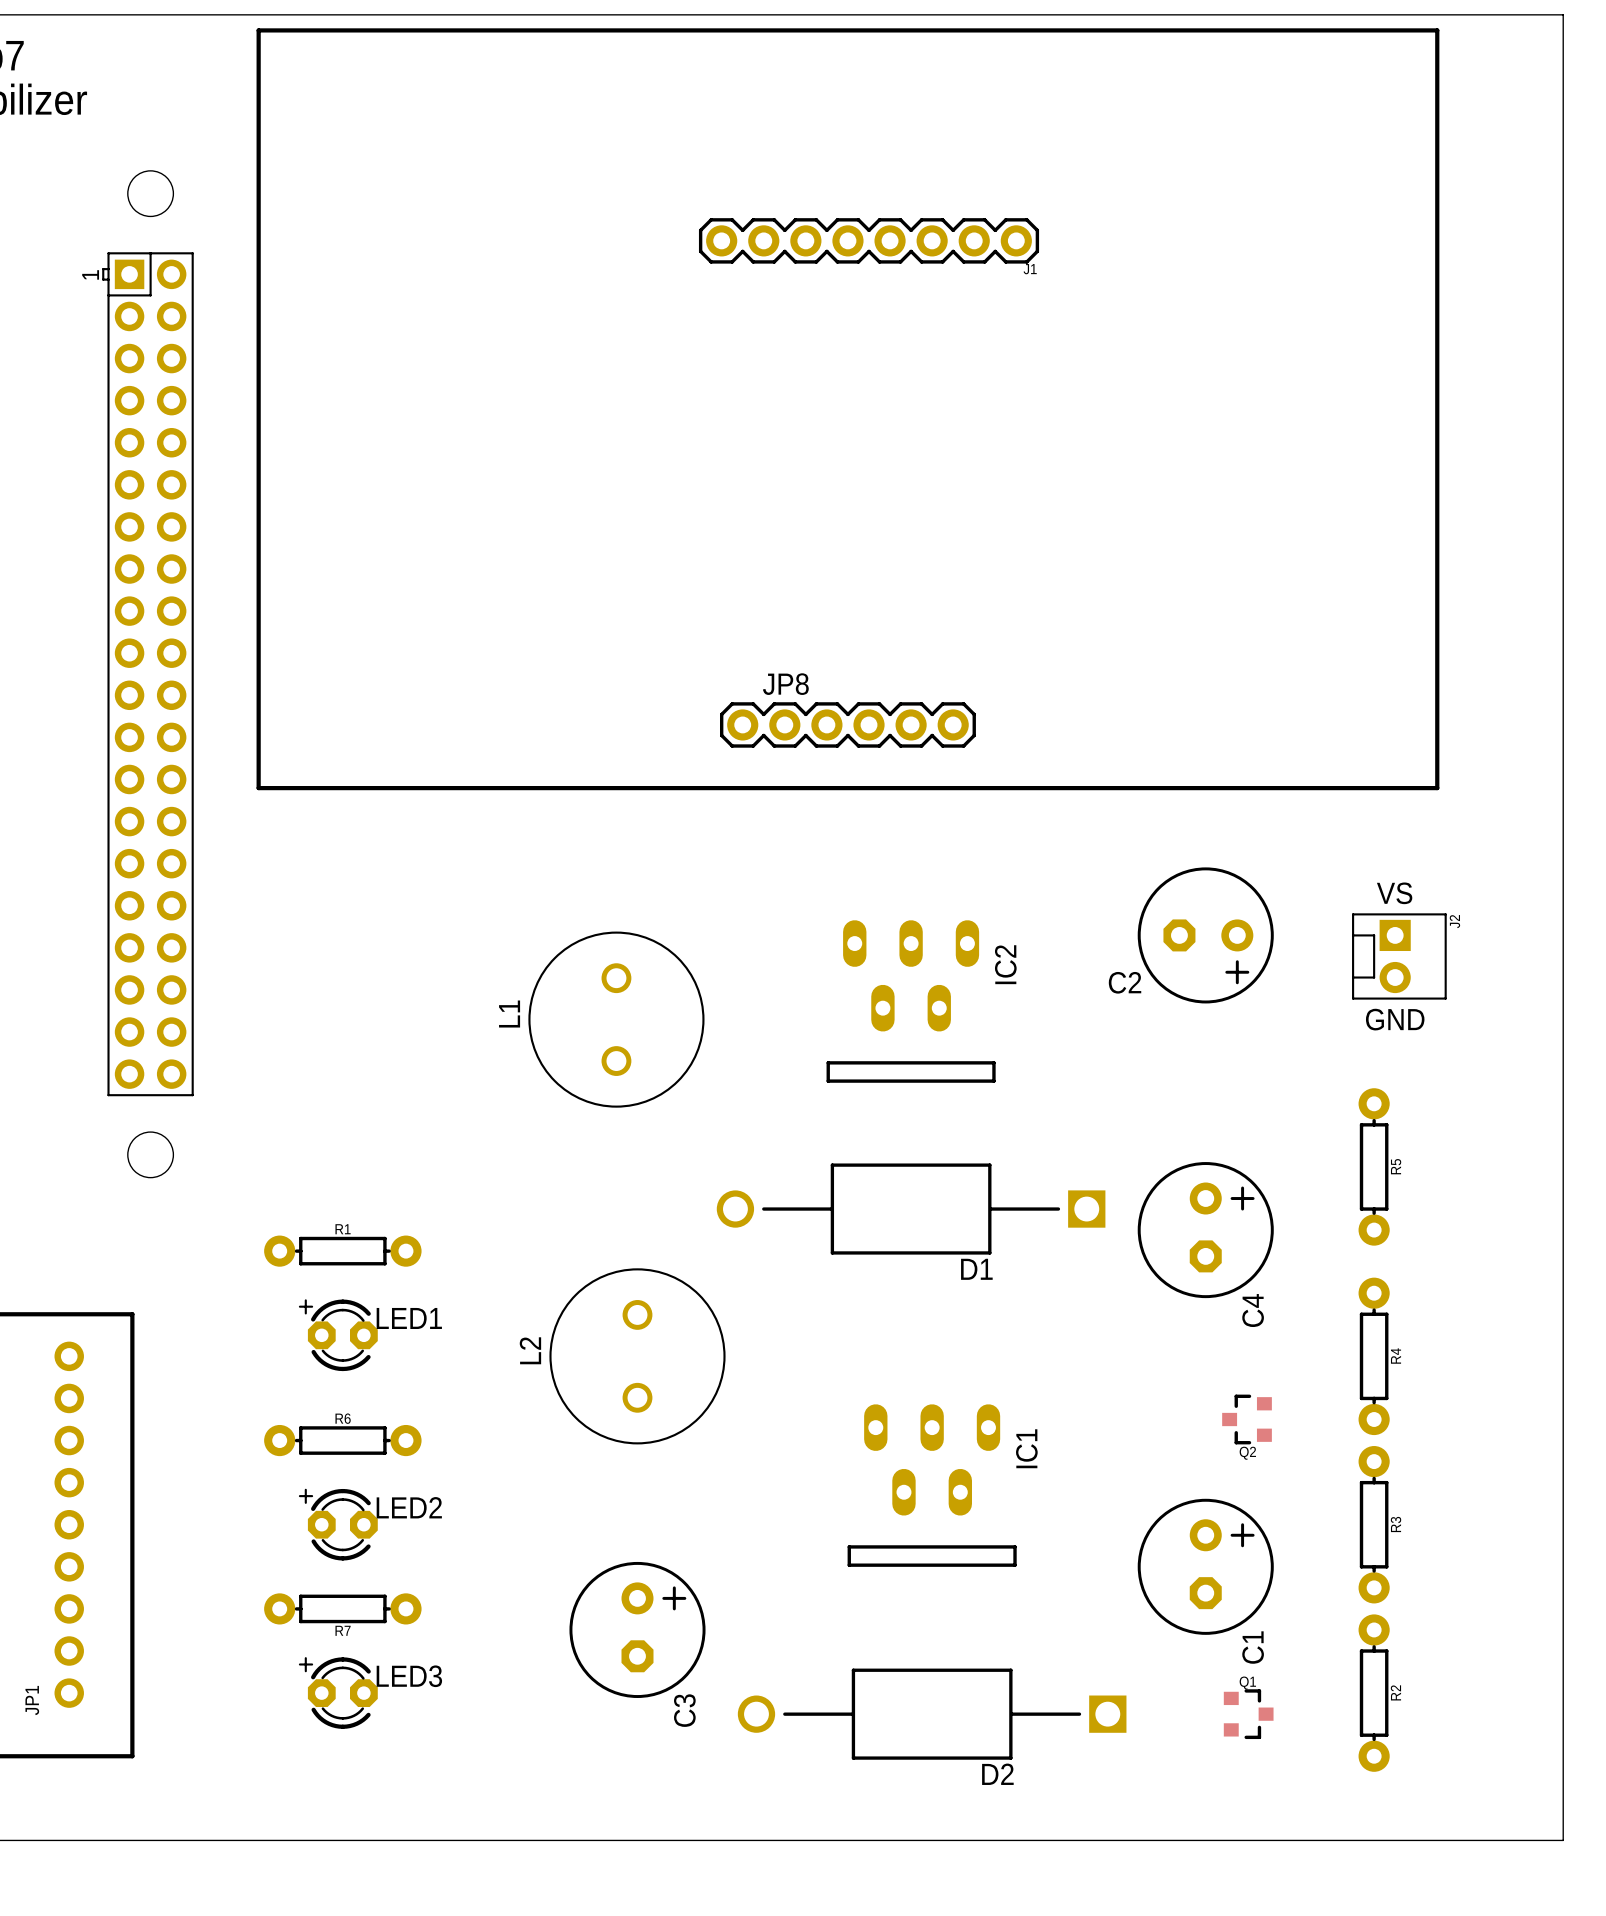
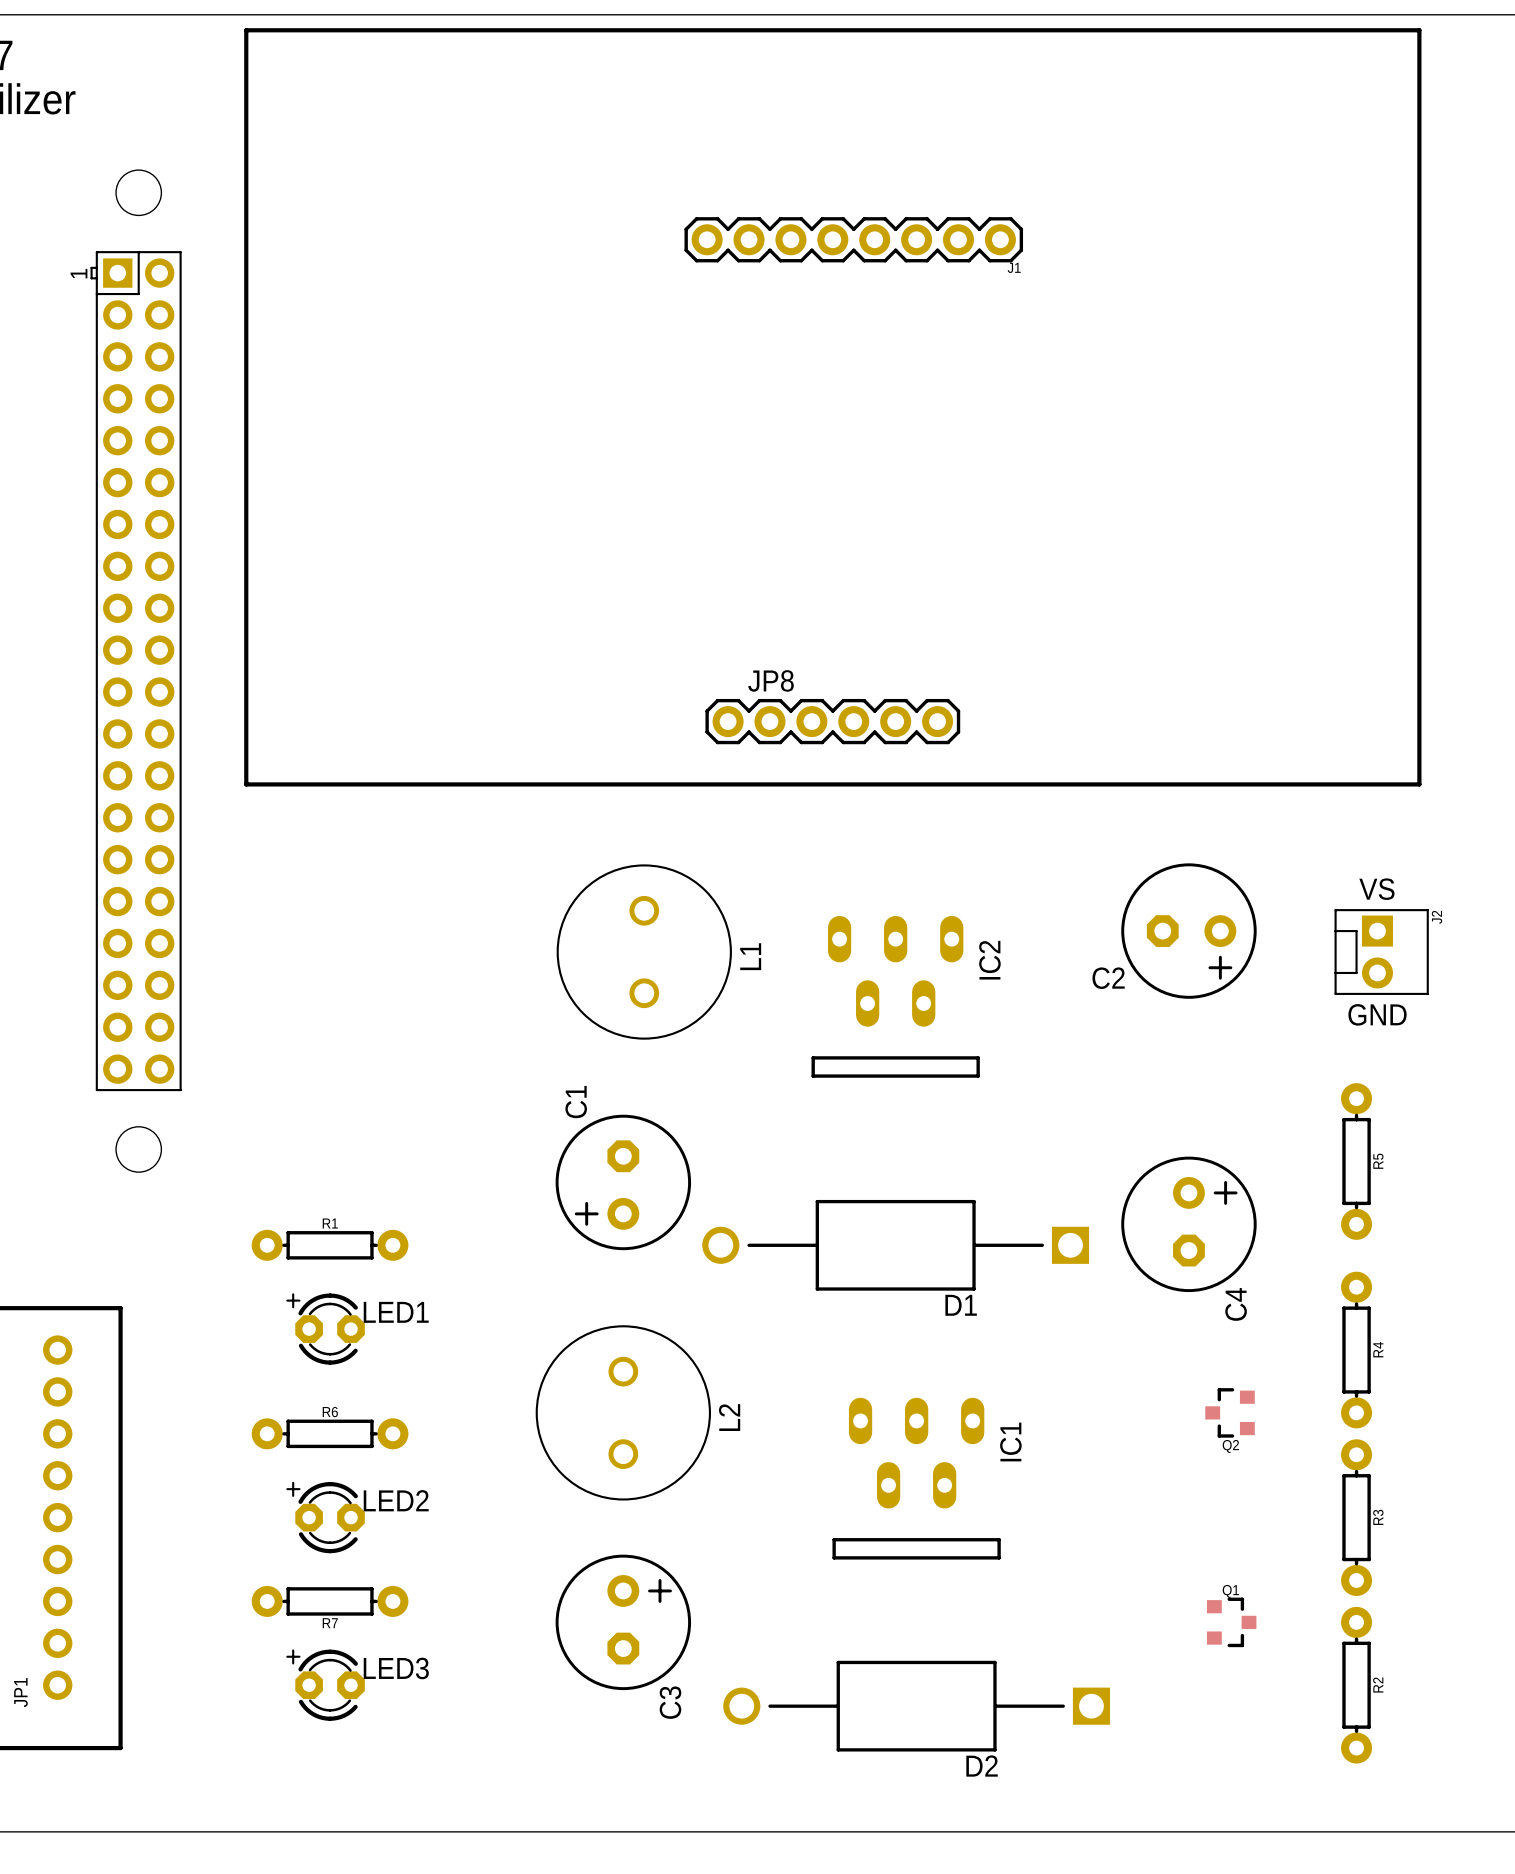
L1 name position: L1 (509, 1014) -> L1 (750, 956)
L1 position: (616, 1019) -> (644, 952)
D1 position: (911, 1209) -> (895, 1245)
L2 name position: L2 (530, 1350) -> L2 (729, 1417)
L2 position: (637, 1356) -> (623, 1412)
C1 rotation: 0° (1205, 1566) -> 180° (623, 1182)
C1 position: (1205, 1566) -> (623, 1182)
Q1 position: (1248, 1714) -> (1231, 1622)

